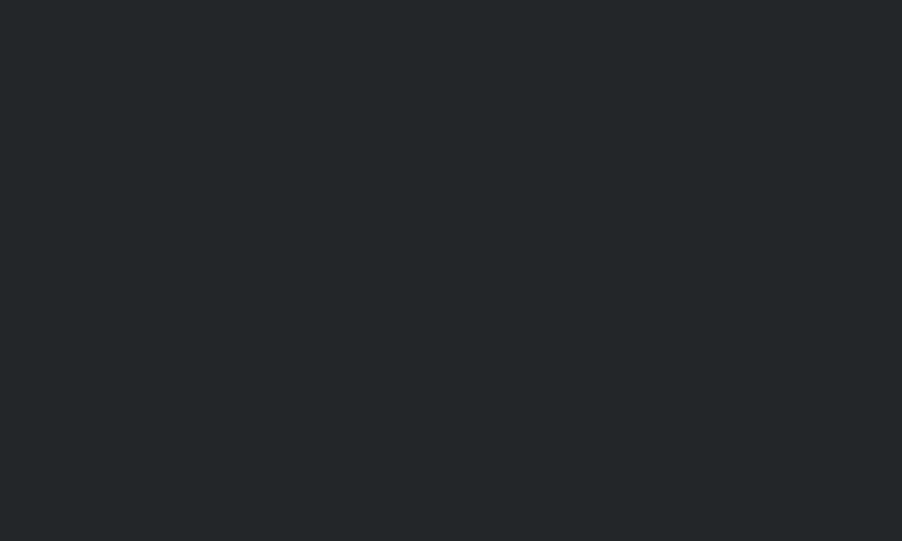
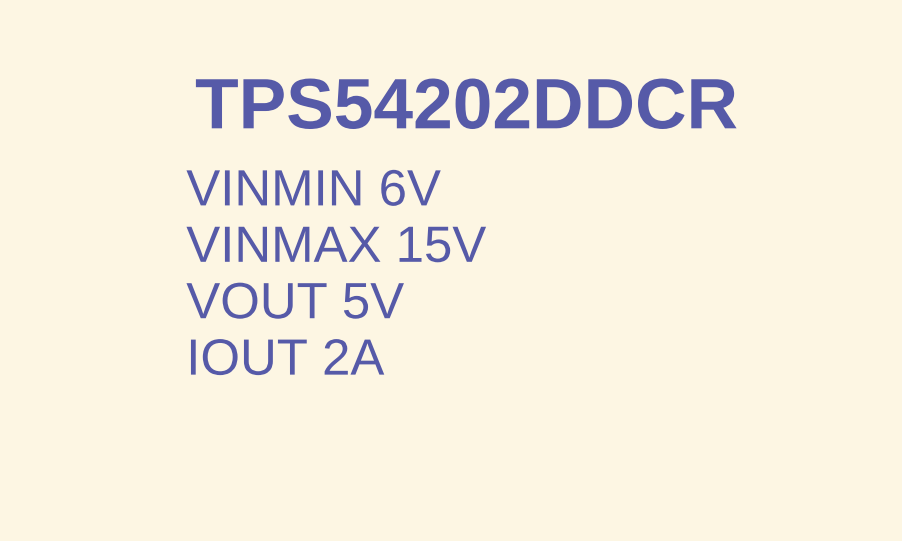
text: none -> TPS54202DDCR (466, 103)
text: none -> VINMIN 6V (313, 187)
text: none -> VINMAX 15V (336, 244)
text: none -> VOUT 5V (295, 300)
text: none -> IOUT 2A (287, 357)

